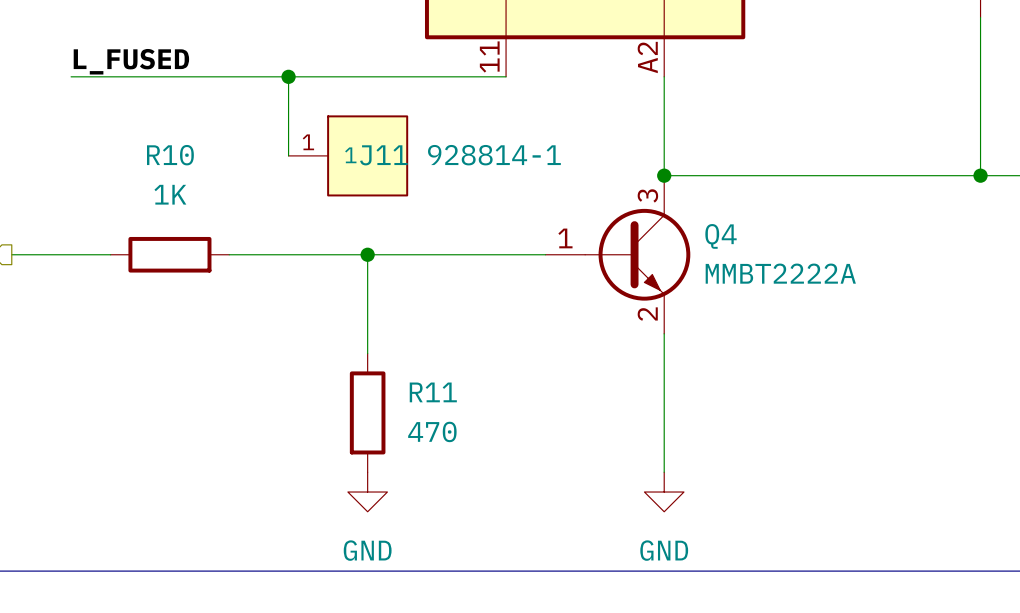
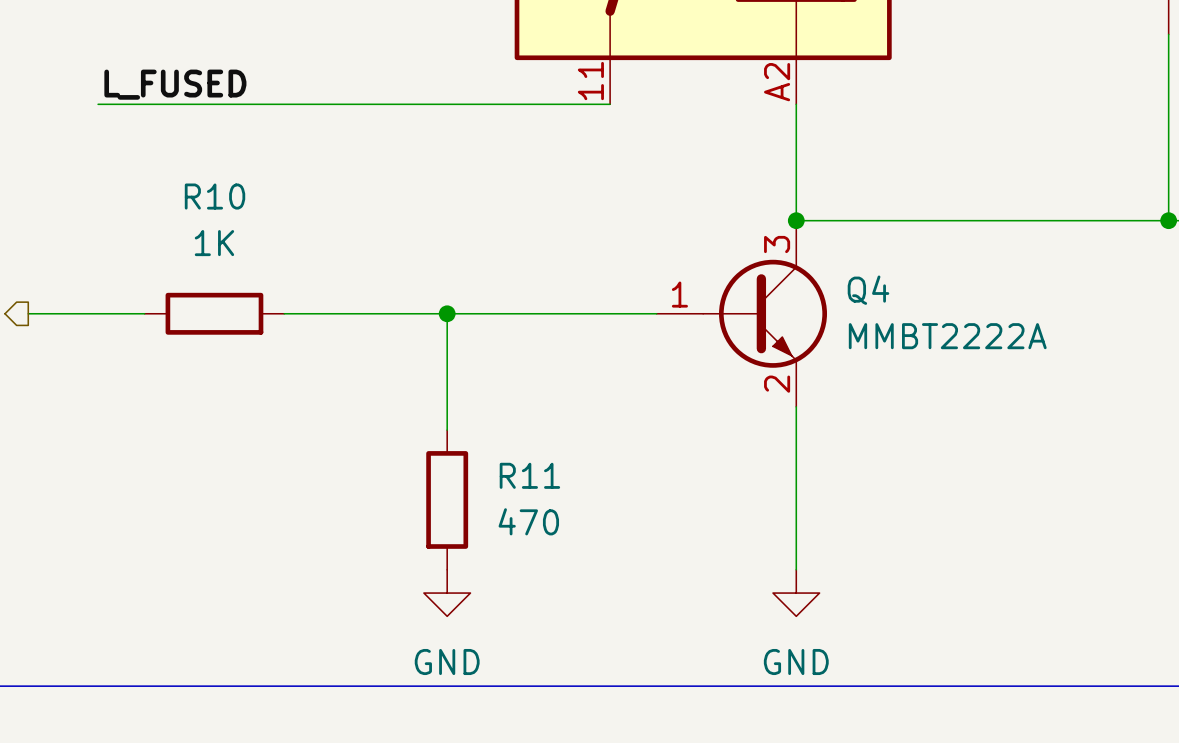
wire: (288, 76) (288, 155) -> none
junction: (288, 76) -> none
J11: 928814-1 (348, 155) -> none

